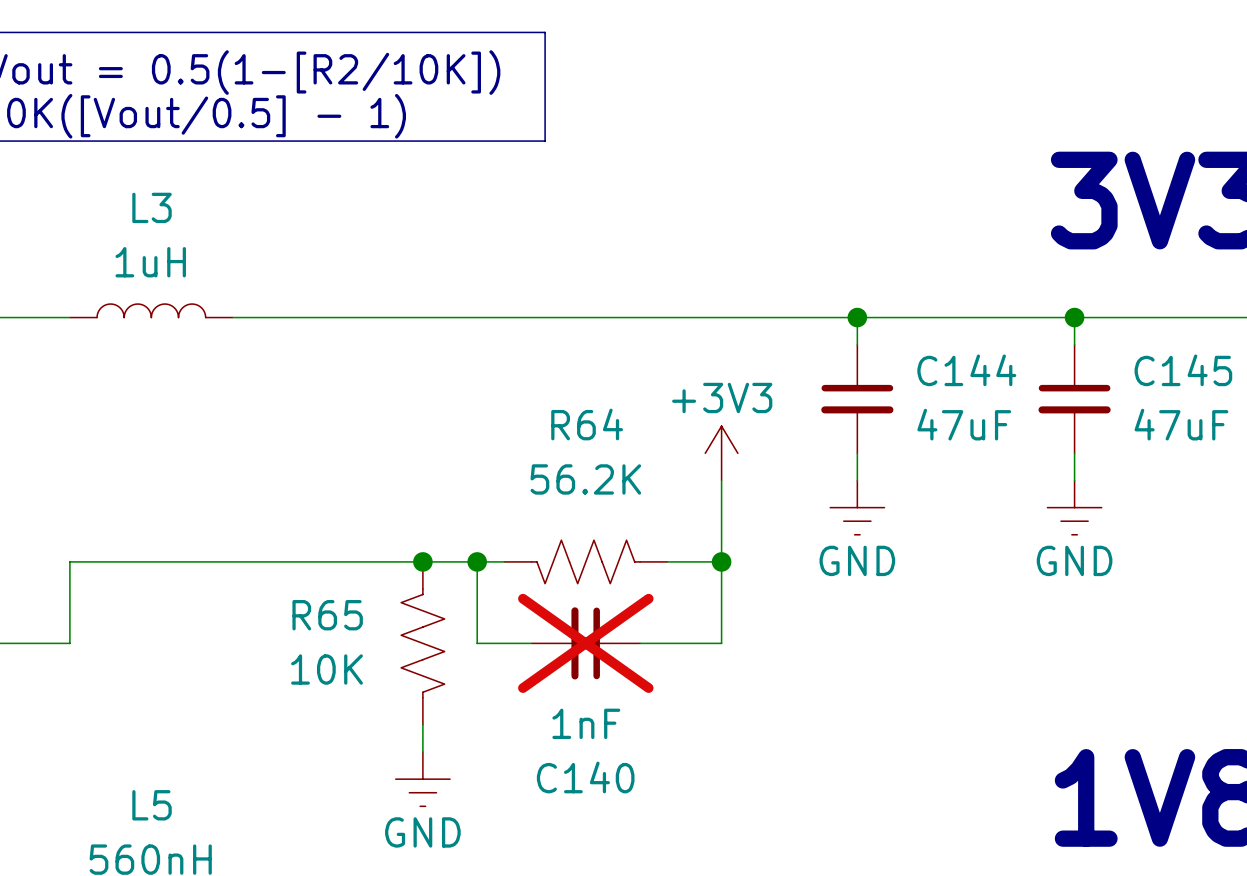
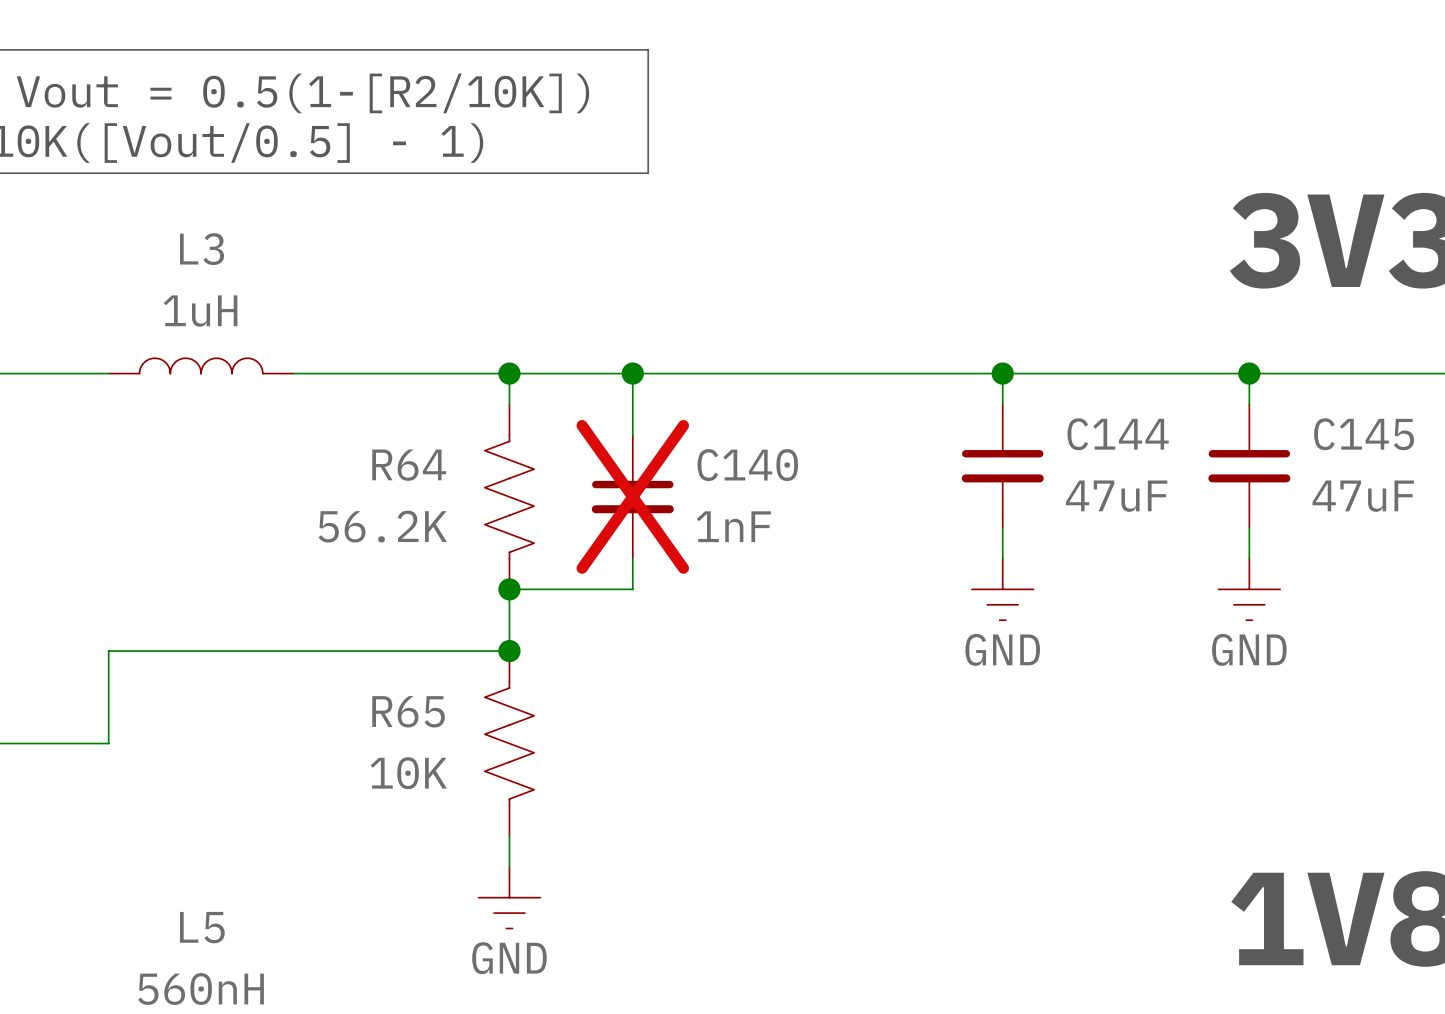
wire: none -> (509, 373) (509, 404)
junction: none -> (509, 373)
wire: none -> (632, 373) (632, 435)
junction: none -> (632, 373)
R64 name position: R64 (587, 424) -> R64 (409, 465)
power symbol: +3V3 (721, 453) -> none
R64 value position: 56.2K (585, 479) -> 56.2K (382, 526)
wire: (721, 480) (721, 643) (640, 643) -> none
wire: (422, 561) (504, 561) -> (509, 651) (509, 589) (632, 589) (632, 558)
wire: (477, 561) (477, 643) (531, 643) -> none
junction position: (477, 561) -> (509, 589)
R64 rotation: 0° (585, 561) -> 90° clockwise (509, 496)
R64 position: (585, 561) -> (509, 496)
wire: (667, 561) (721, 561) -> none
junction: (721, 561) -> none
C140 rotation: 0° (585, 643) -> 90° counterclockwise (632, 497)
C140 position: (585, 643) -> (632, 496)

